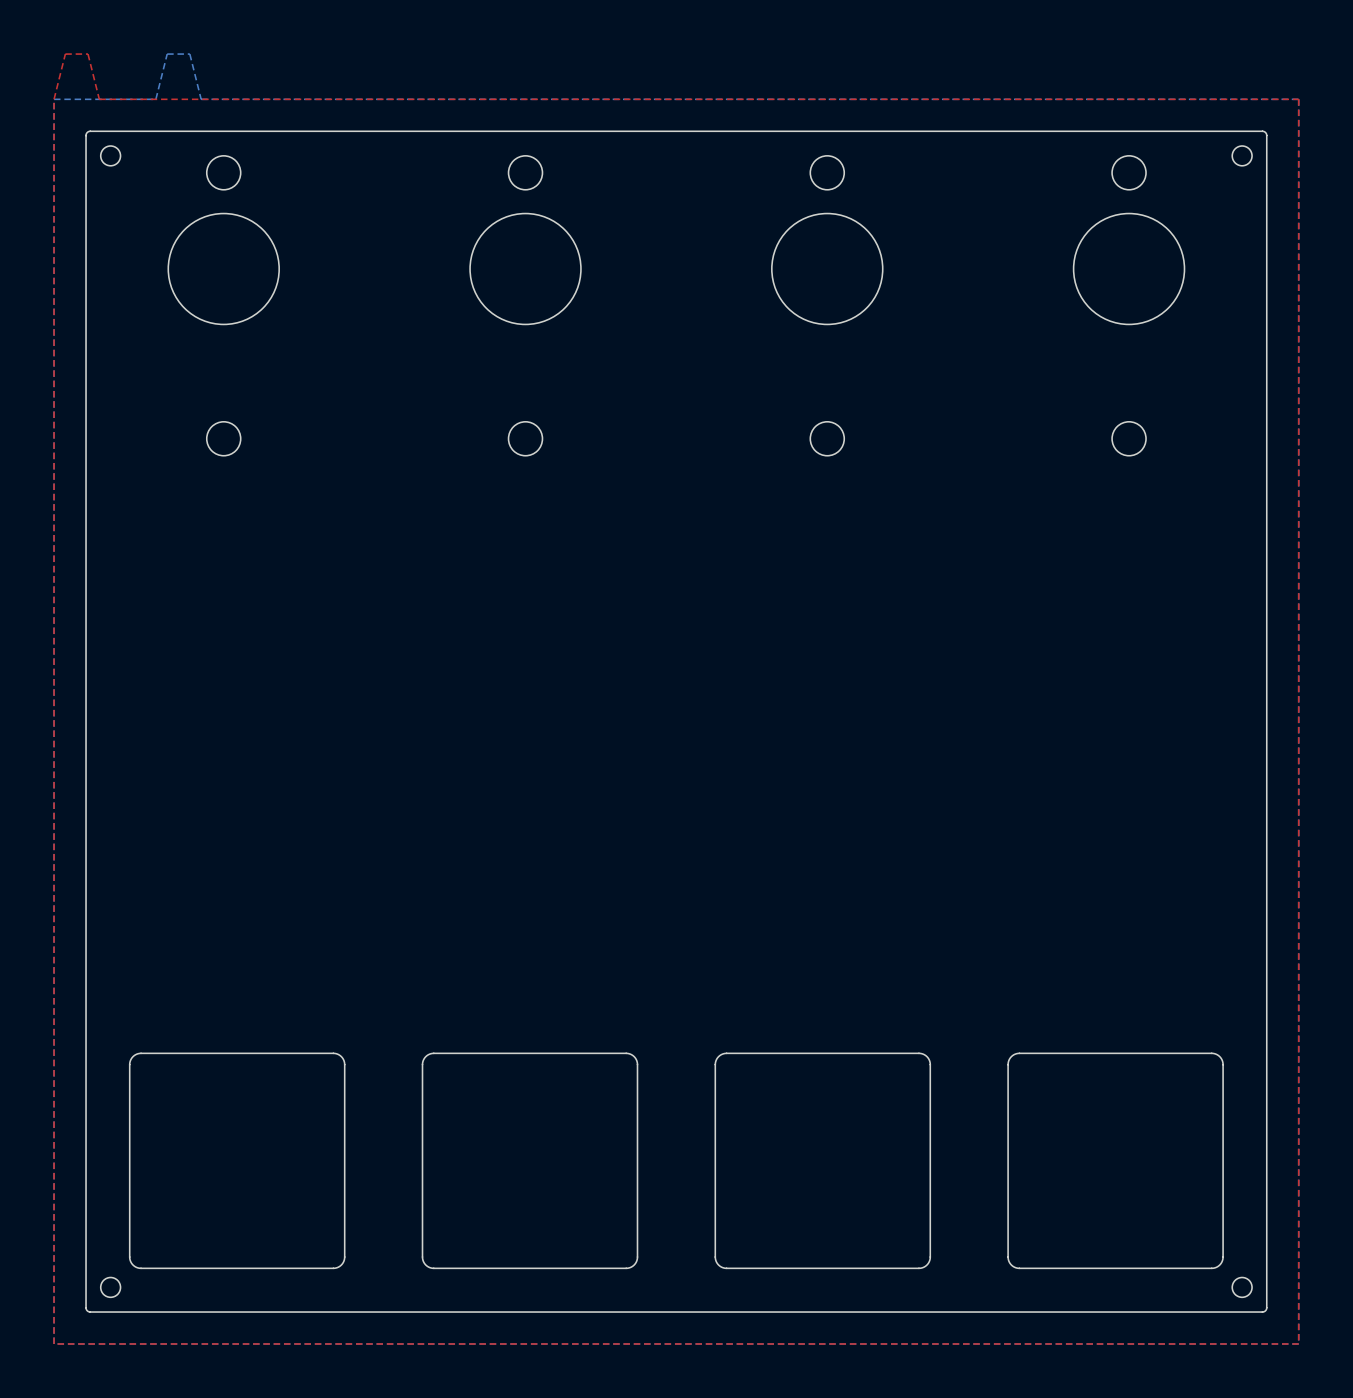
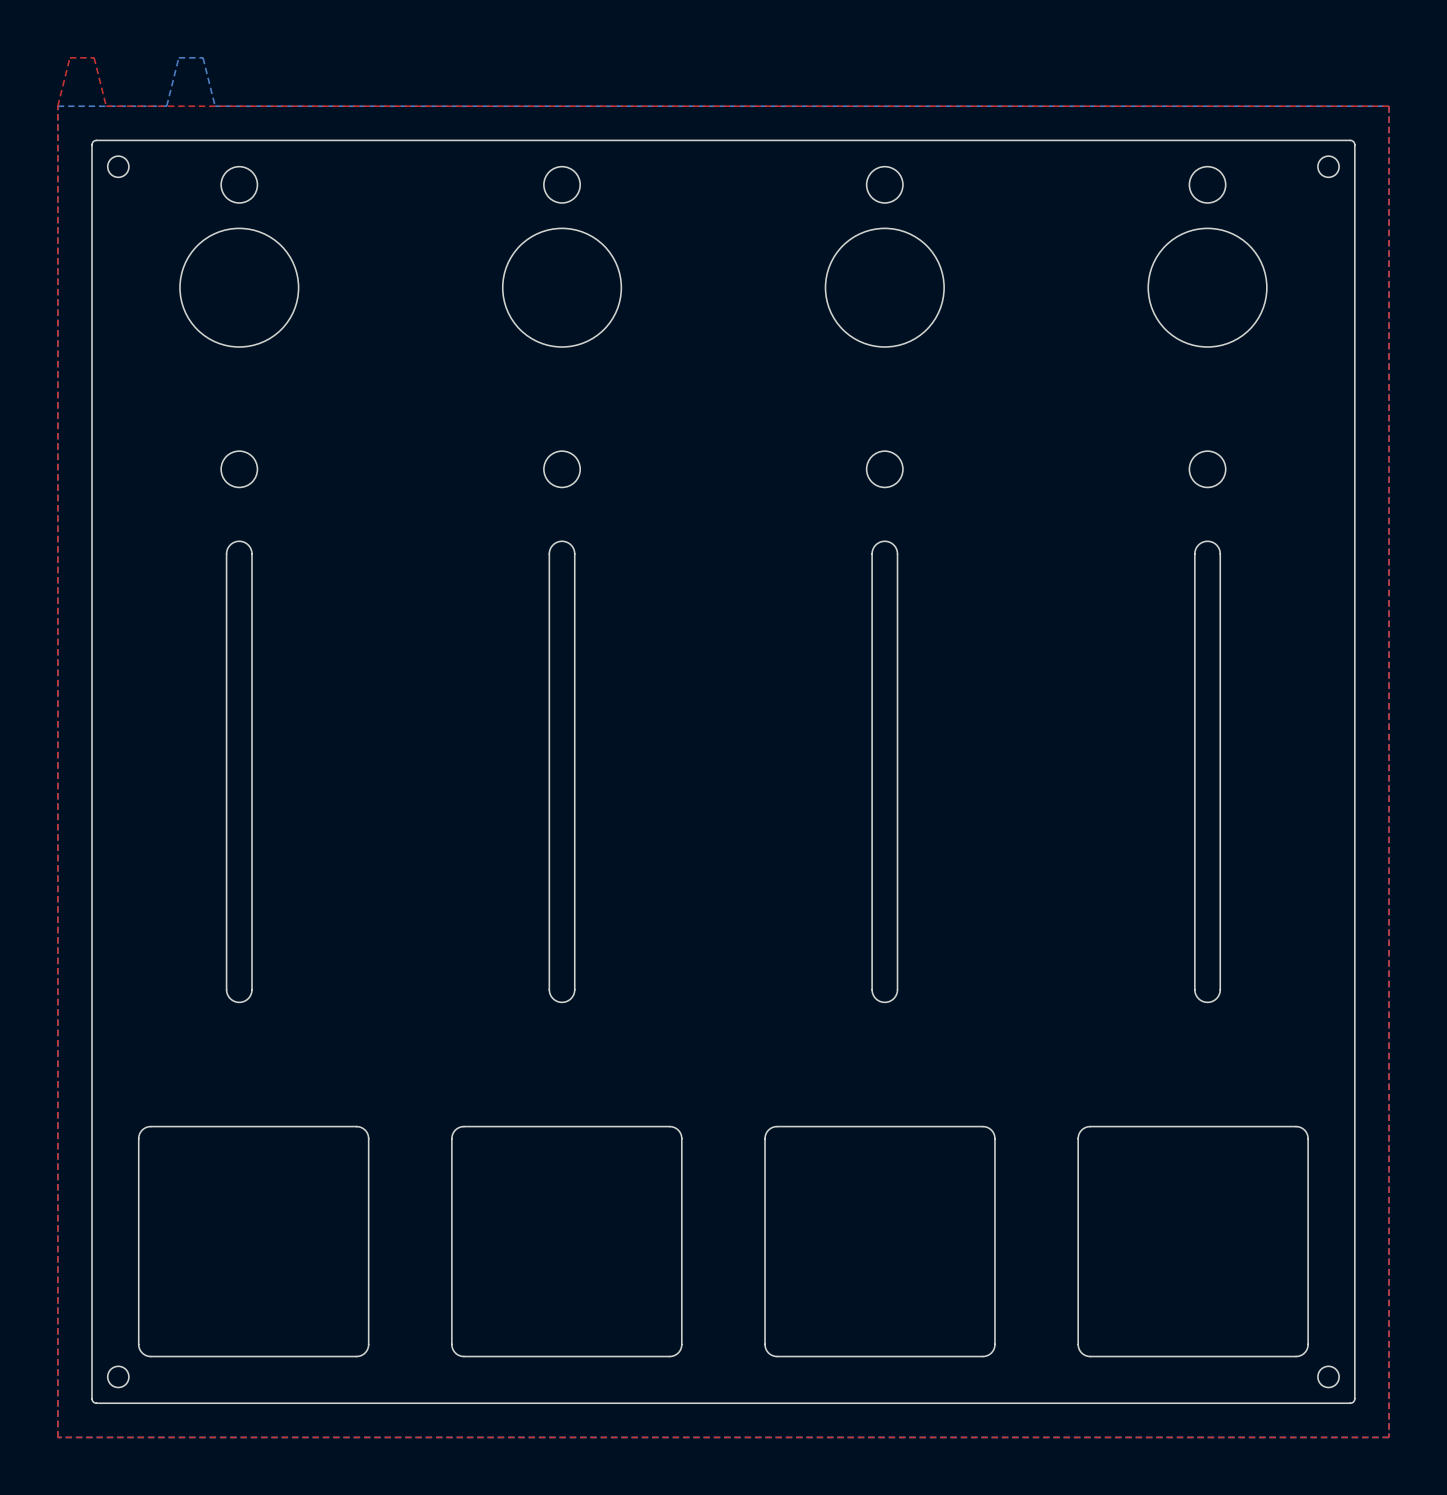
board edge: none -> (226, 553) (226, 989) (229, 998) (239, 1002) (247, 999) (251, 989) (251, 553) (247, 544) (239, 541) (230, 544) (226, 553)
board edge: none -> (549, 553) (549, 989) (553, 999) (562, 1002) (570, 999) (574, 989) (574, 553) (571, 545) (562, 541) (553, 545) (549, 553)
board edge: none -> (872, 553) (872, 989) (876, 999) (884, 1002) (893, 999) (897, 989) (897, 553) (894, 545) (884, 541) (875, 545) (872, 553)
board edge: none -> (1194, 553) (1194, 989) (1199, 999) (1207, 1002) (1215, 999) (1220, 989) (1220, 553) (1216, 545) (1207, 541) (1198, 545) (1194, 553)

